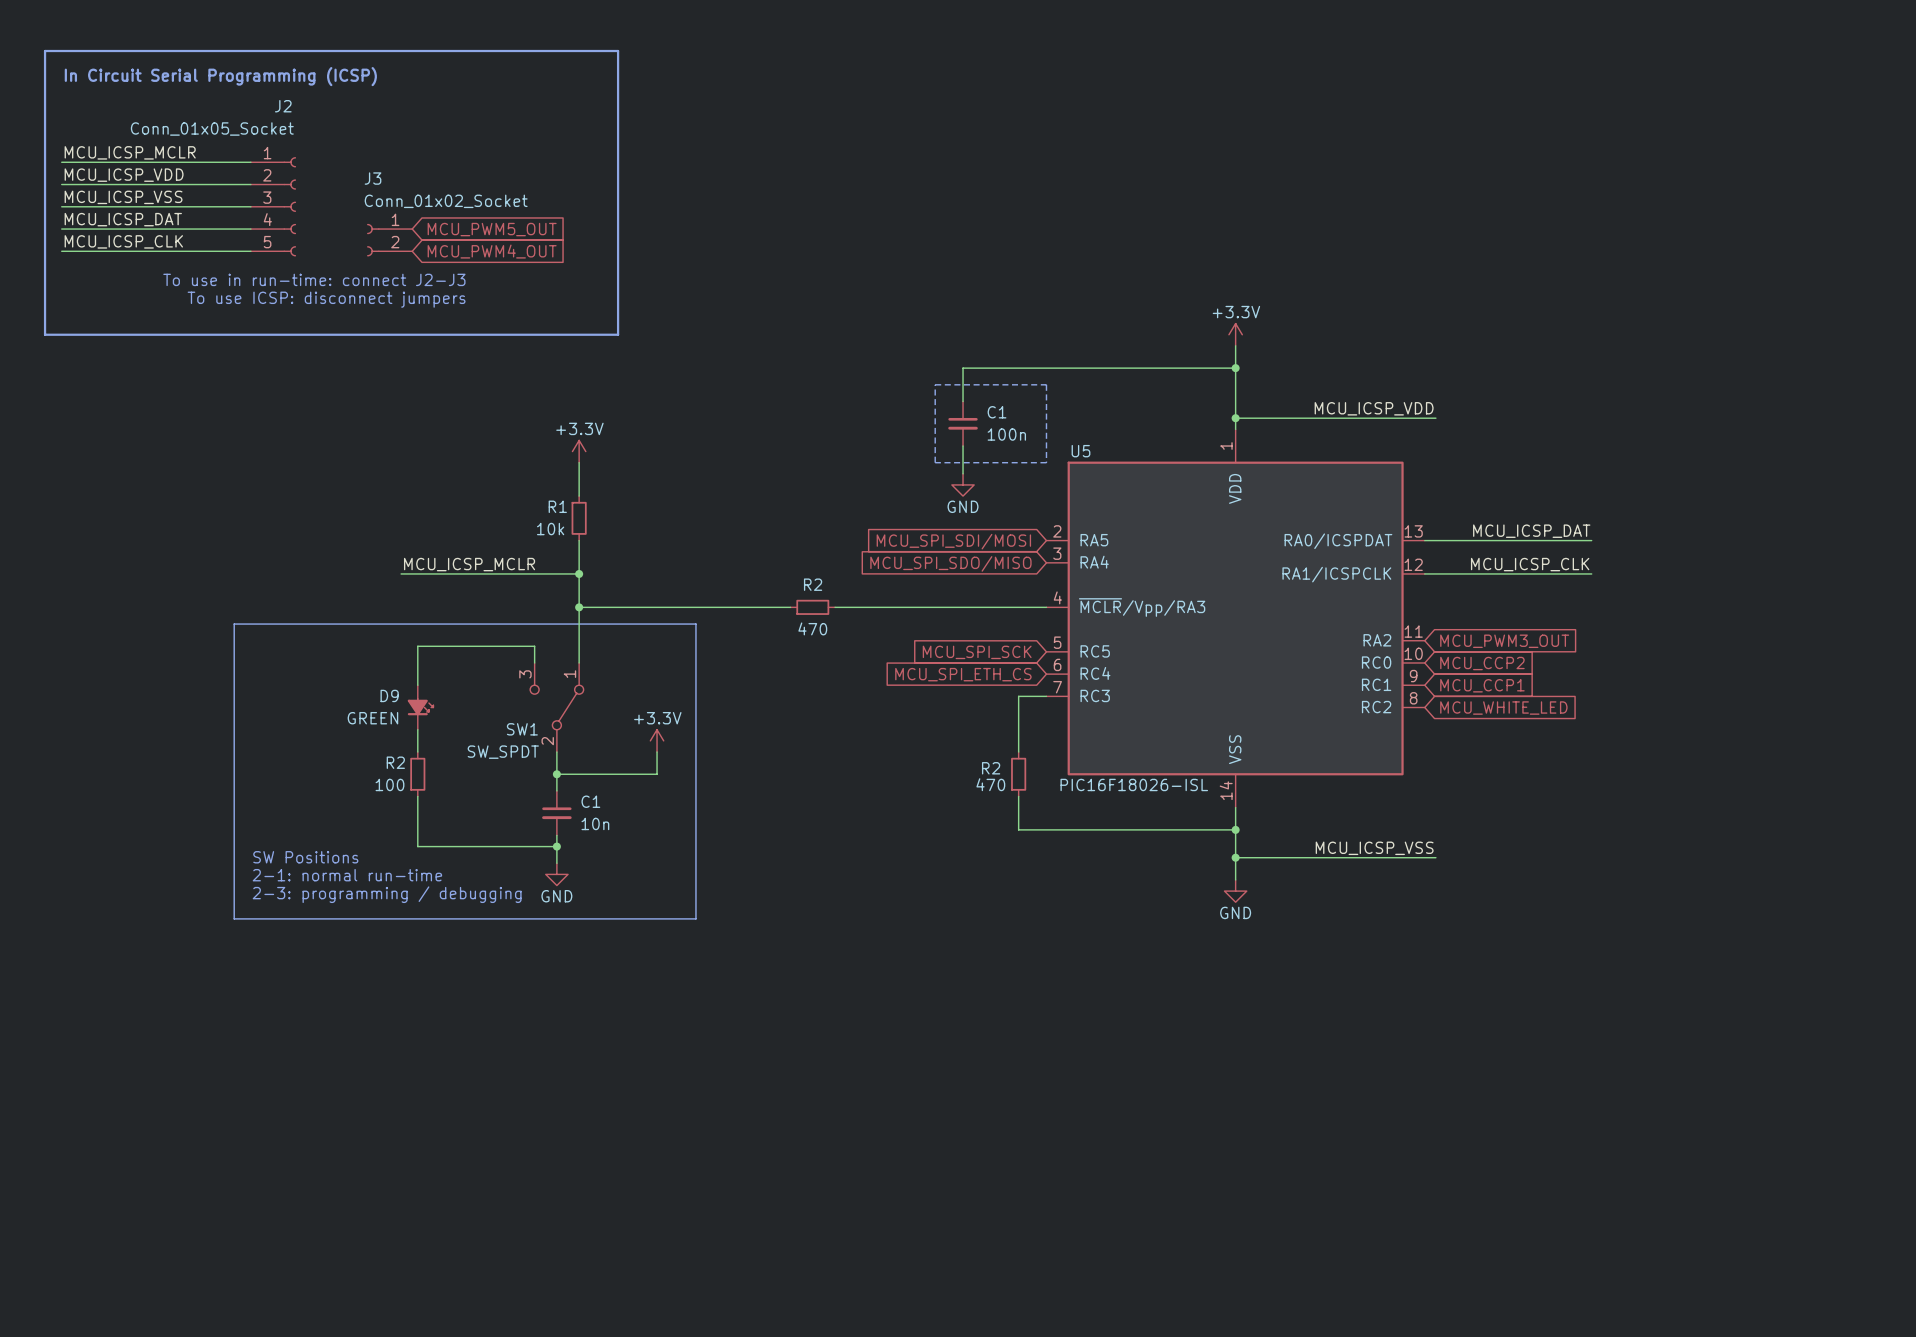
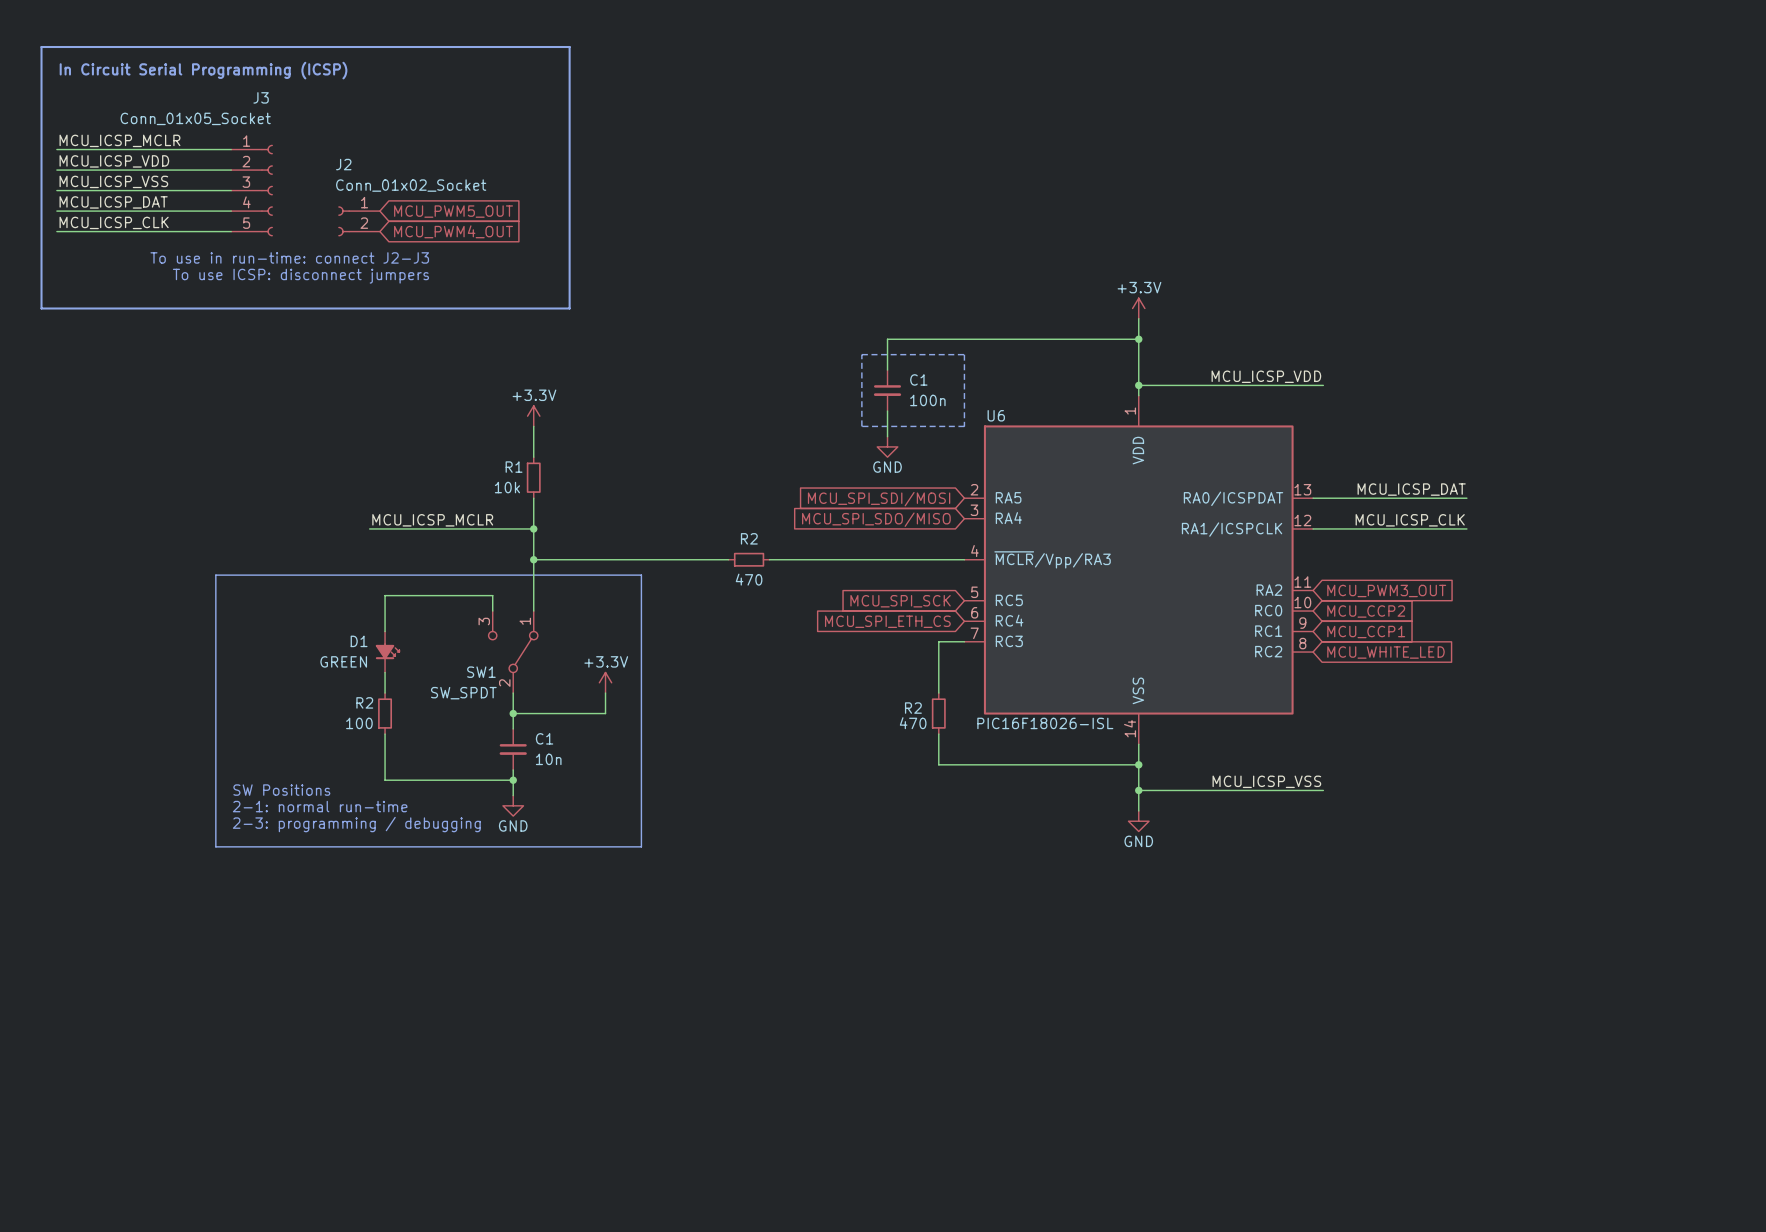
J2 name: J2 (283, 106) -> J3 (261, 97)
J3 name: J3 (373, 178) -> J2 (343, 164)
U5 name: U5 (1080, 451) -> U6 (996, 415)
D9 name: D9 (389, 695) -> D1 (359, 641)

